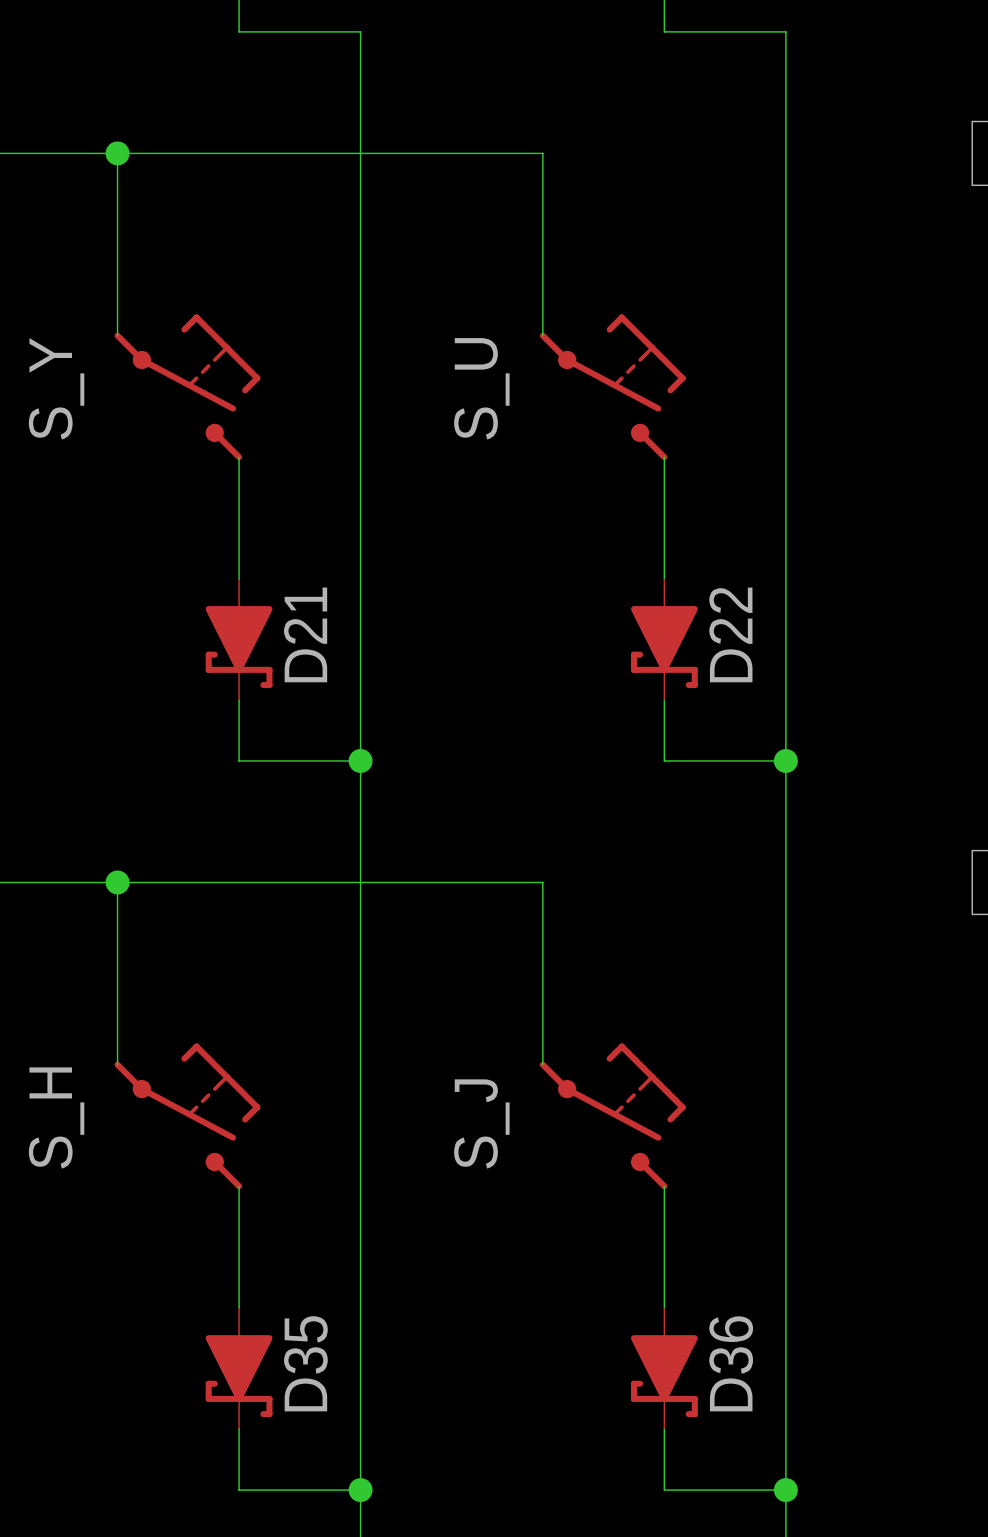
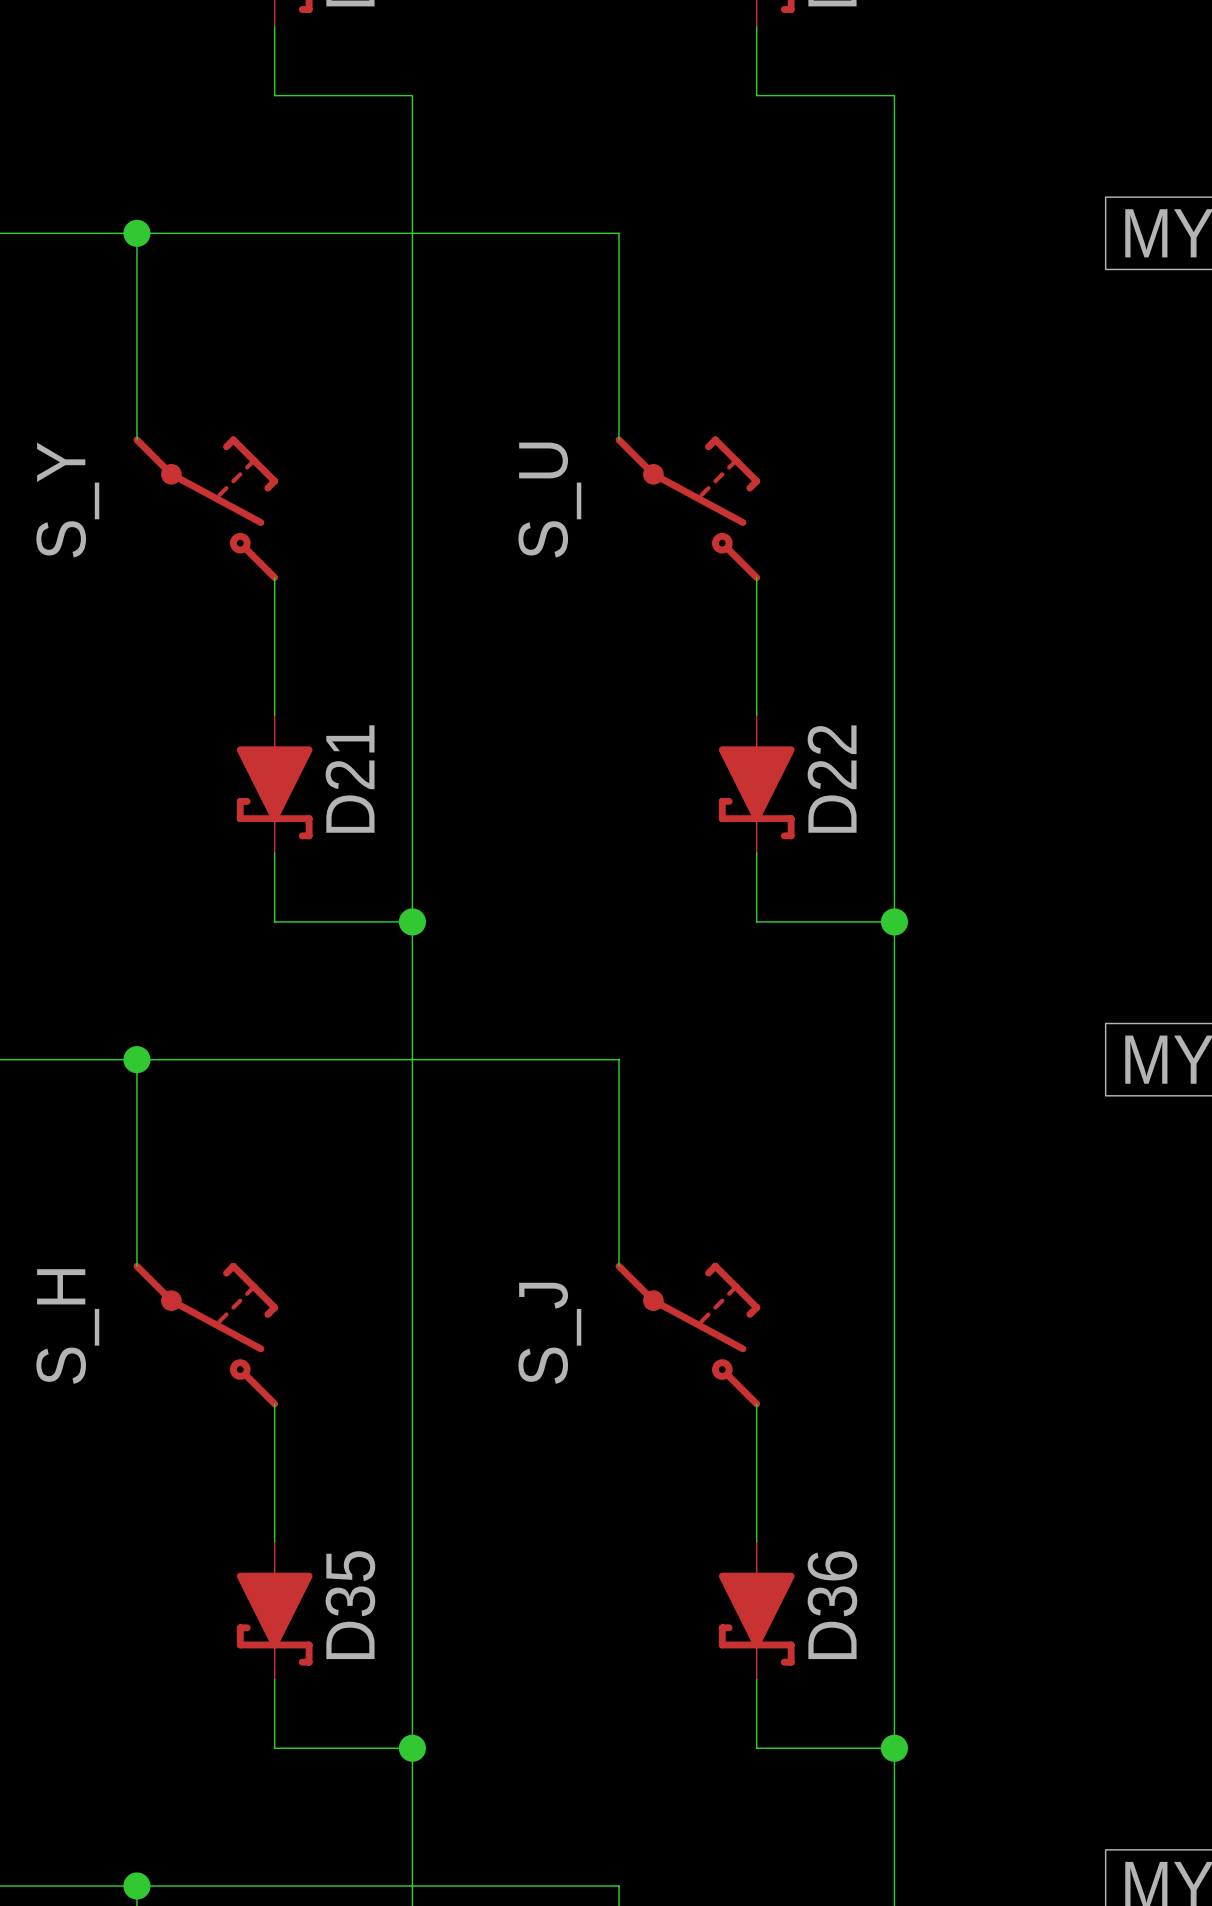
S_Y symbol: [114, 314, 261, 461] -> [133, 436, 279, 582]
S_U symbol: [539, 314, 686, 461] -> [615, 436, 761, 582]
S_H symbol: [114, 1043, 261, 1190] -> [133, 1262, 279, 1408]
S_J symbol: [539, 1043, 686, 1190] -> [615, 1262, 761, 1408]

